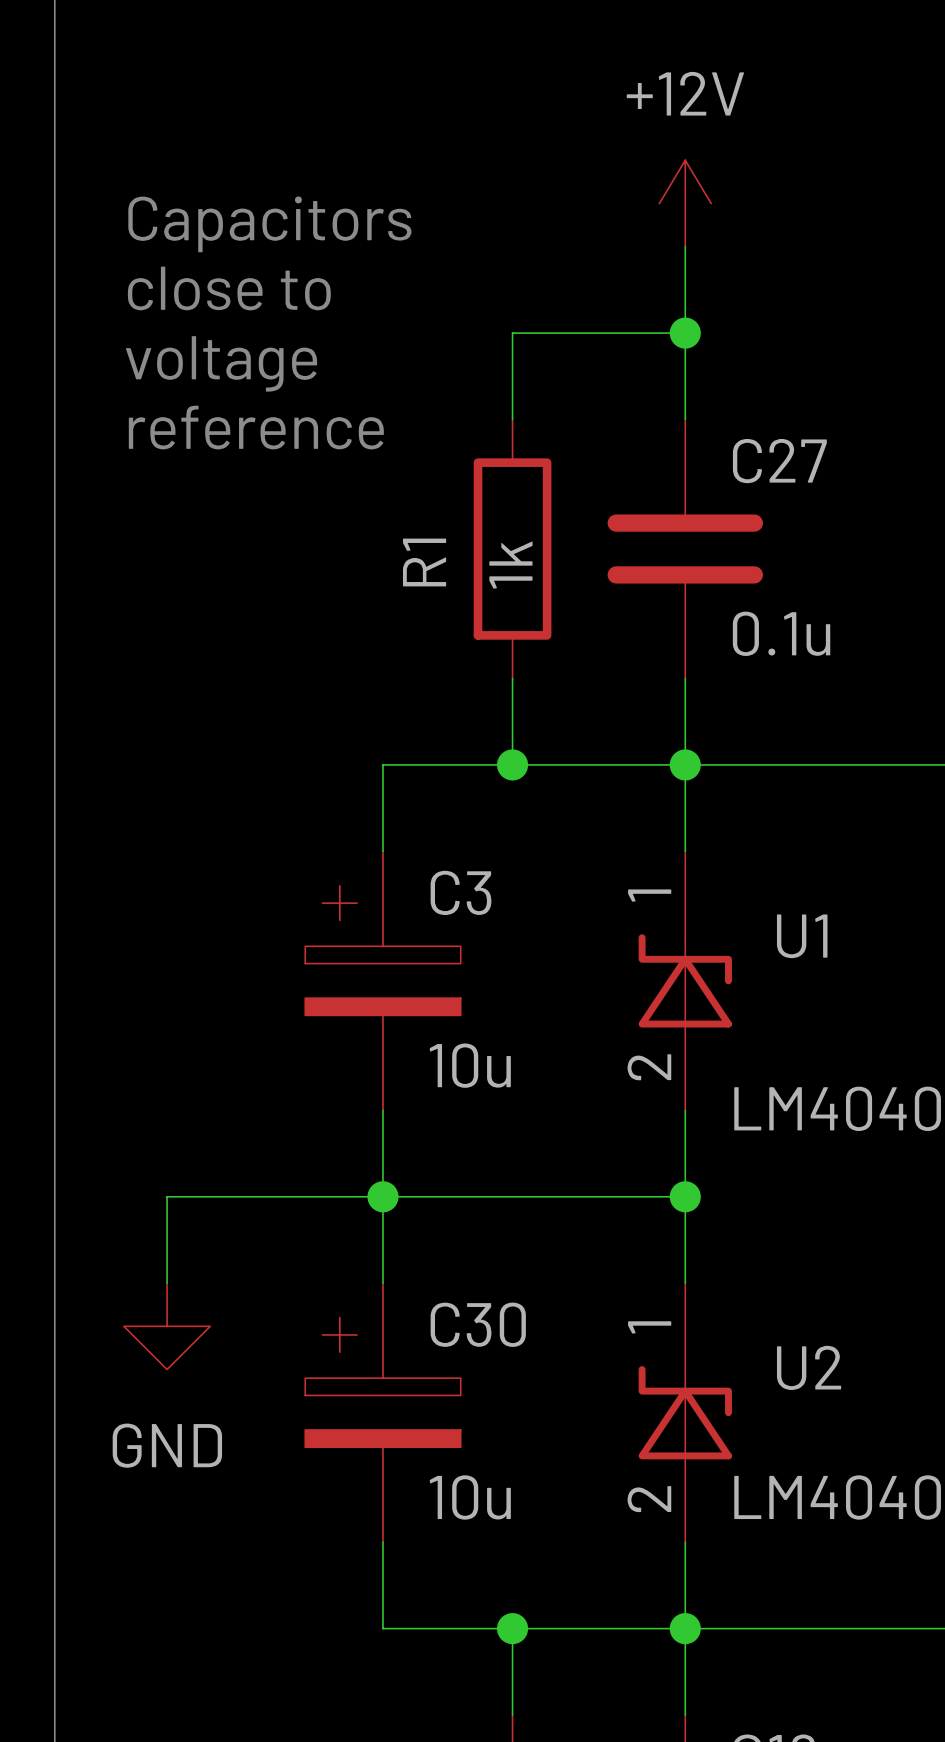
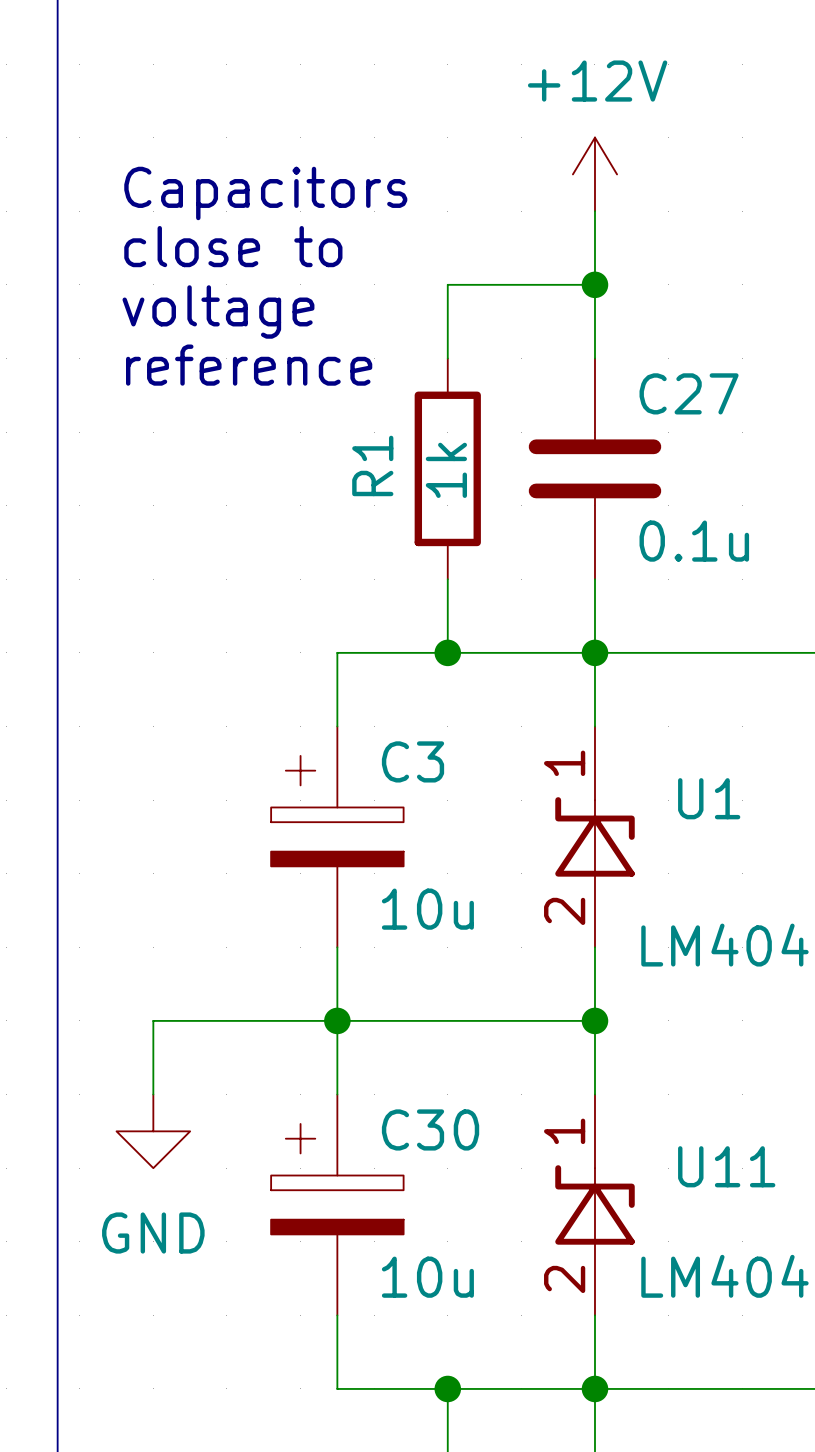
U2 name: U2 (809, 1367) -> U11 (726, 1166)

